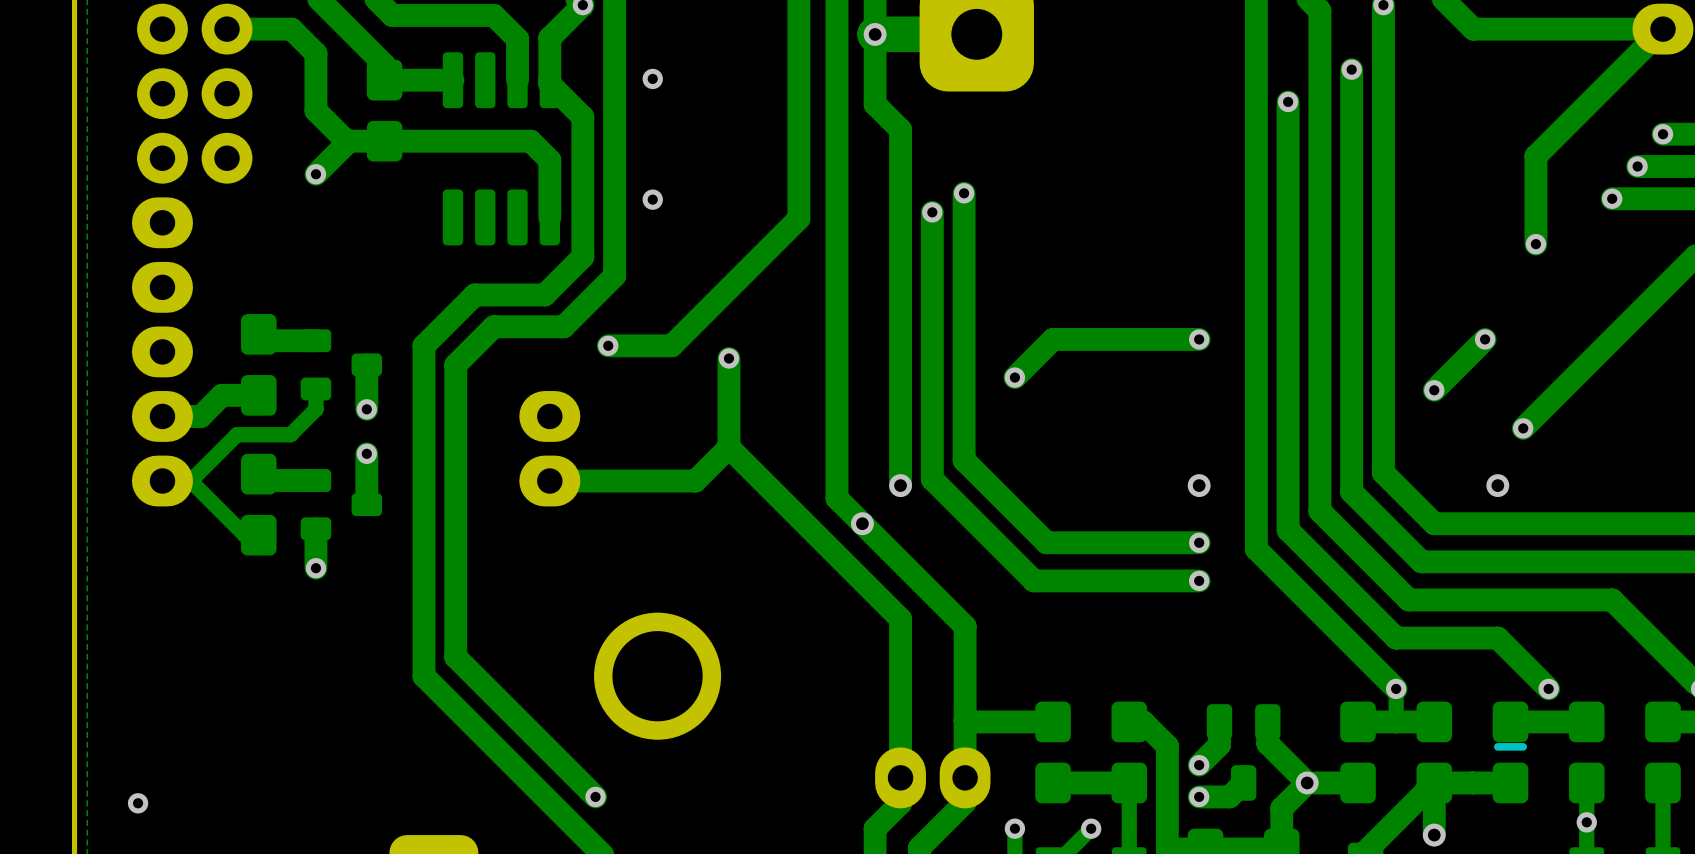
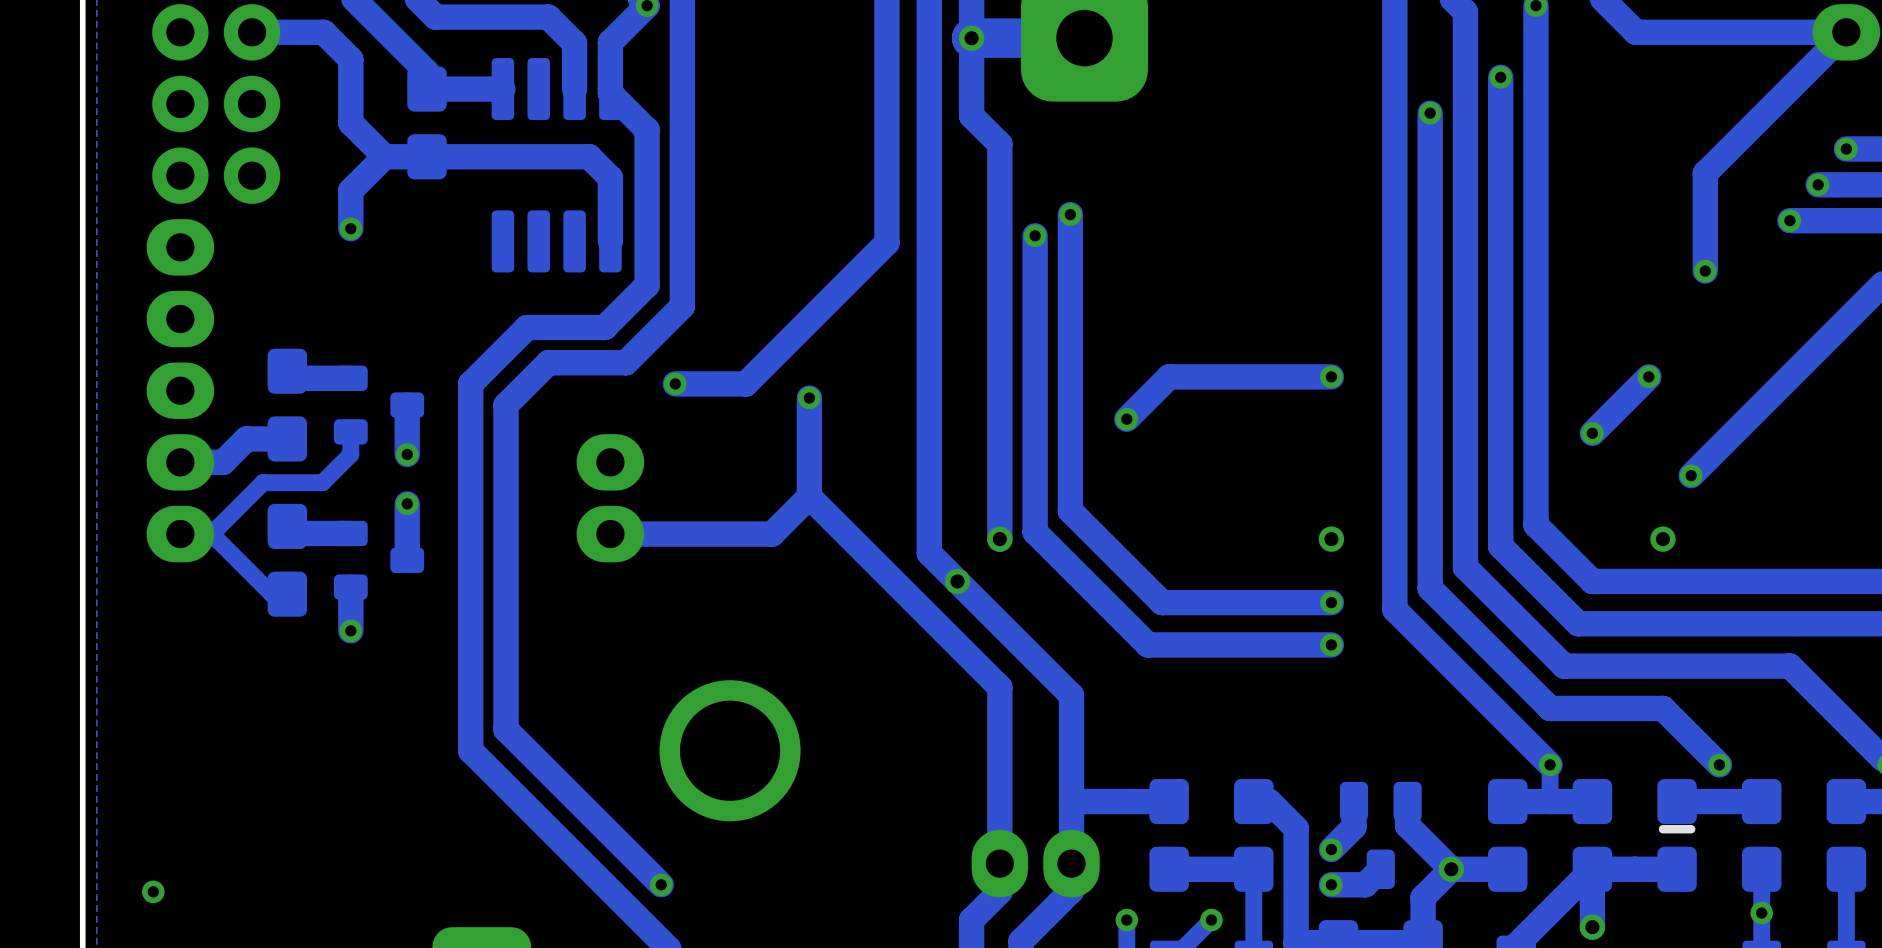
via: (652, 78) -> none
track: (346, 141) (346, 143) (315, 174) -> (384, 156) (350, 190) (350, 228)
via position: (315, 174) -> (350, 228)
via: (652, 199) -> none

